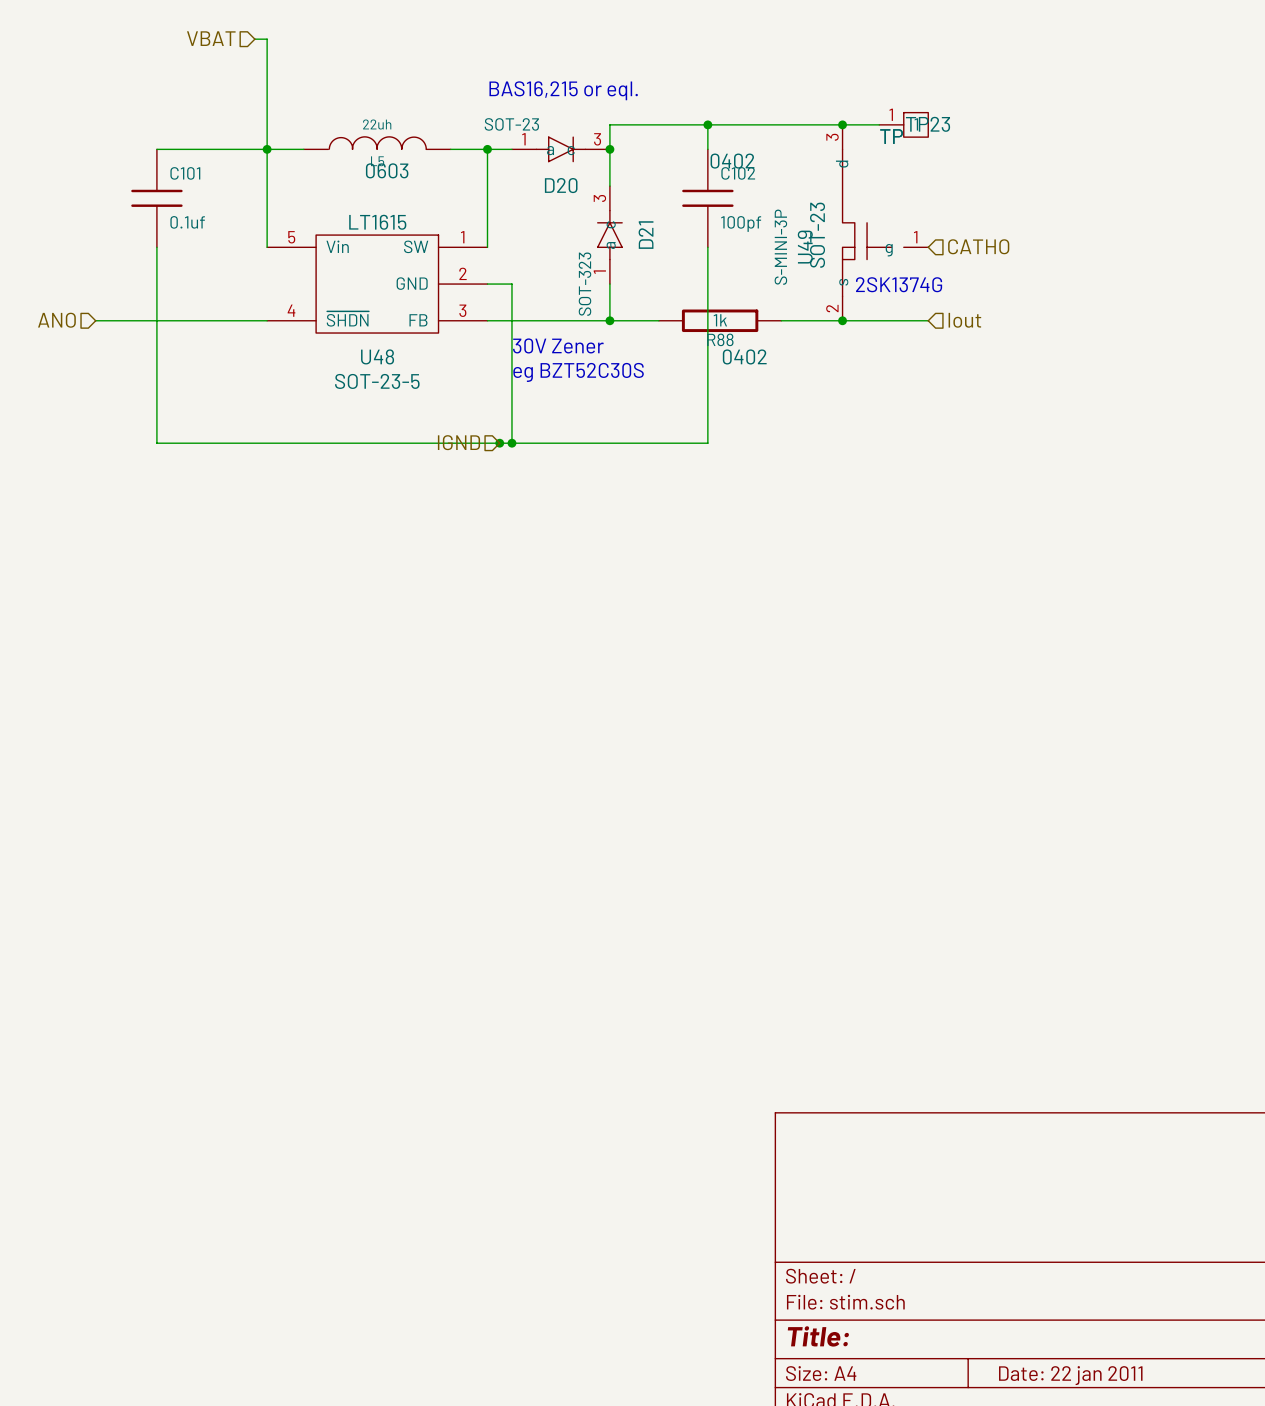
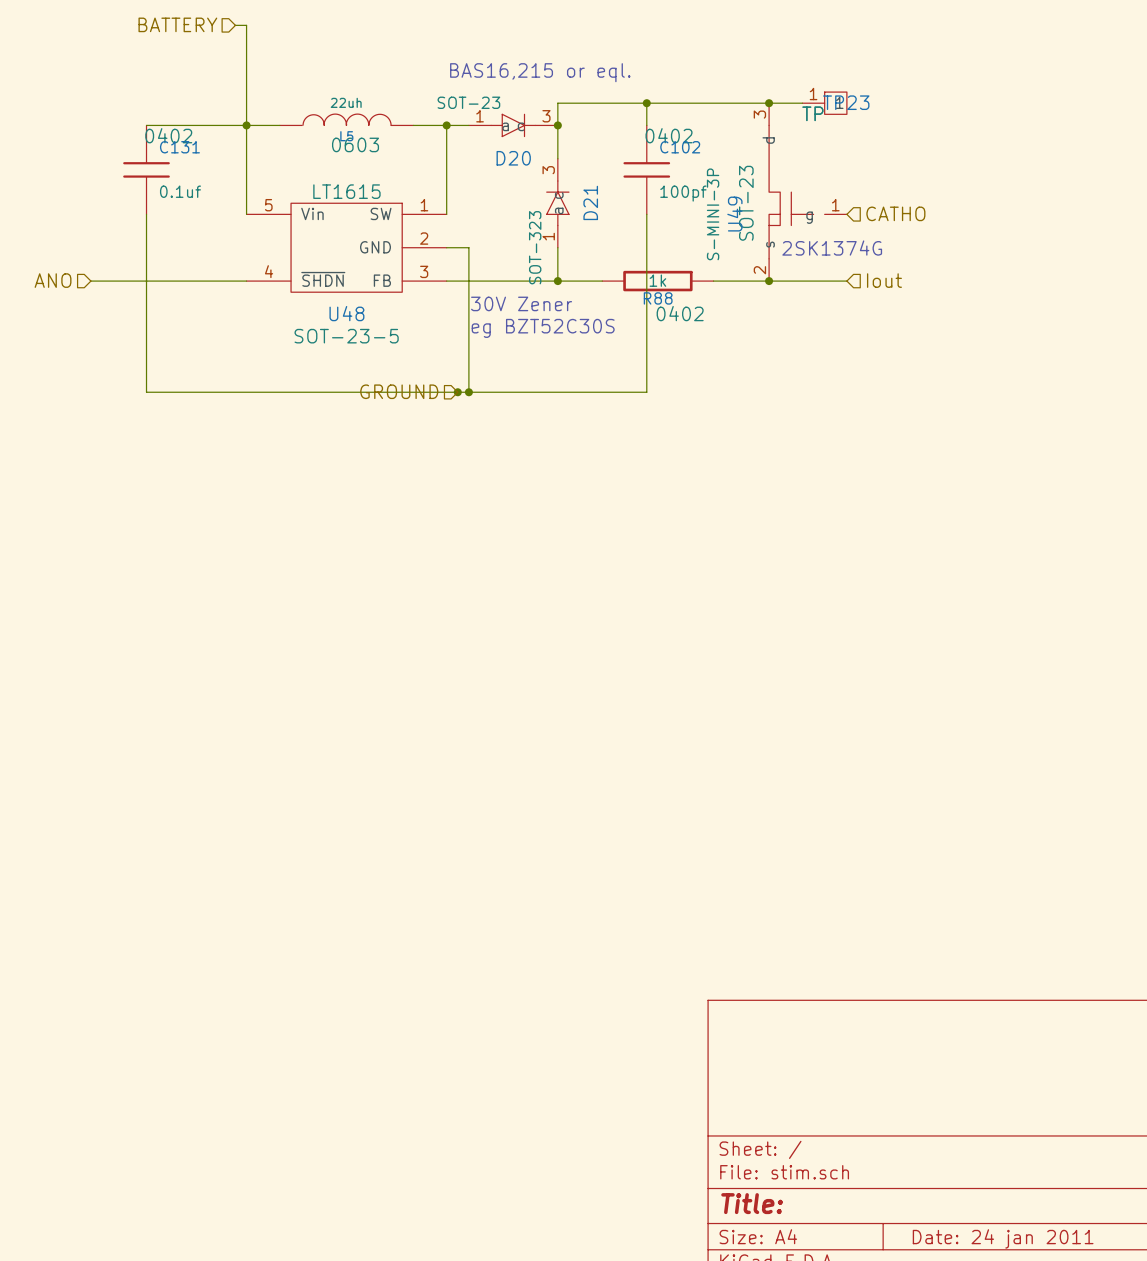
hierarchical label: VBAT (211, 38) -> BATTERY (177, 24)
C101 text: none -> 0402 (168, 135)
C101 name: C101 (185, 173) -> C131 (179, 147)
hierarchical label: IGND (458, 442) -> GROUND (399, 391)
title block: Date: 22 jan 2011 (1070, 1375) -> Date: 24 jan 2011 (1003, 1238)

